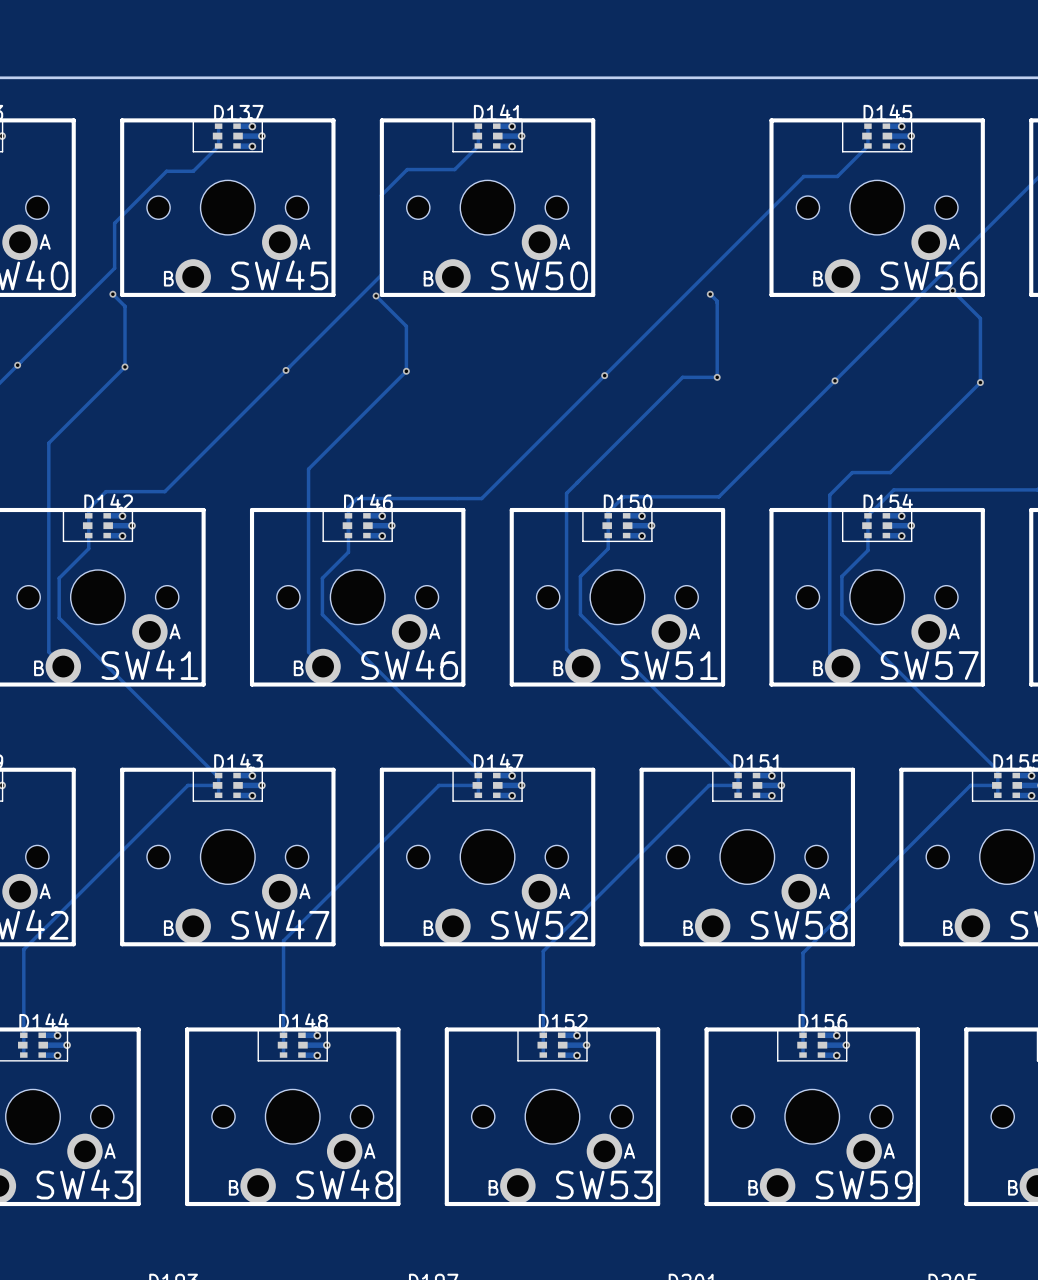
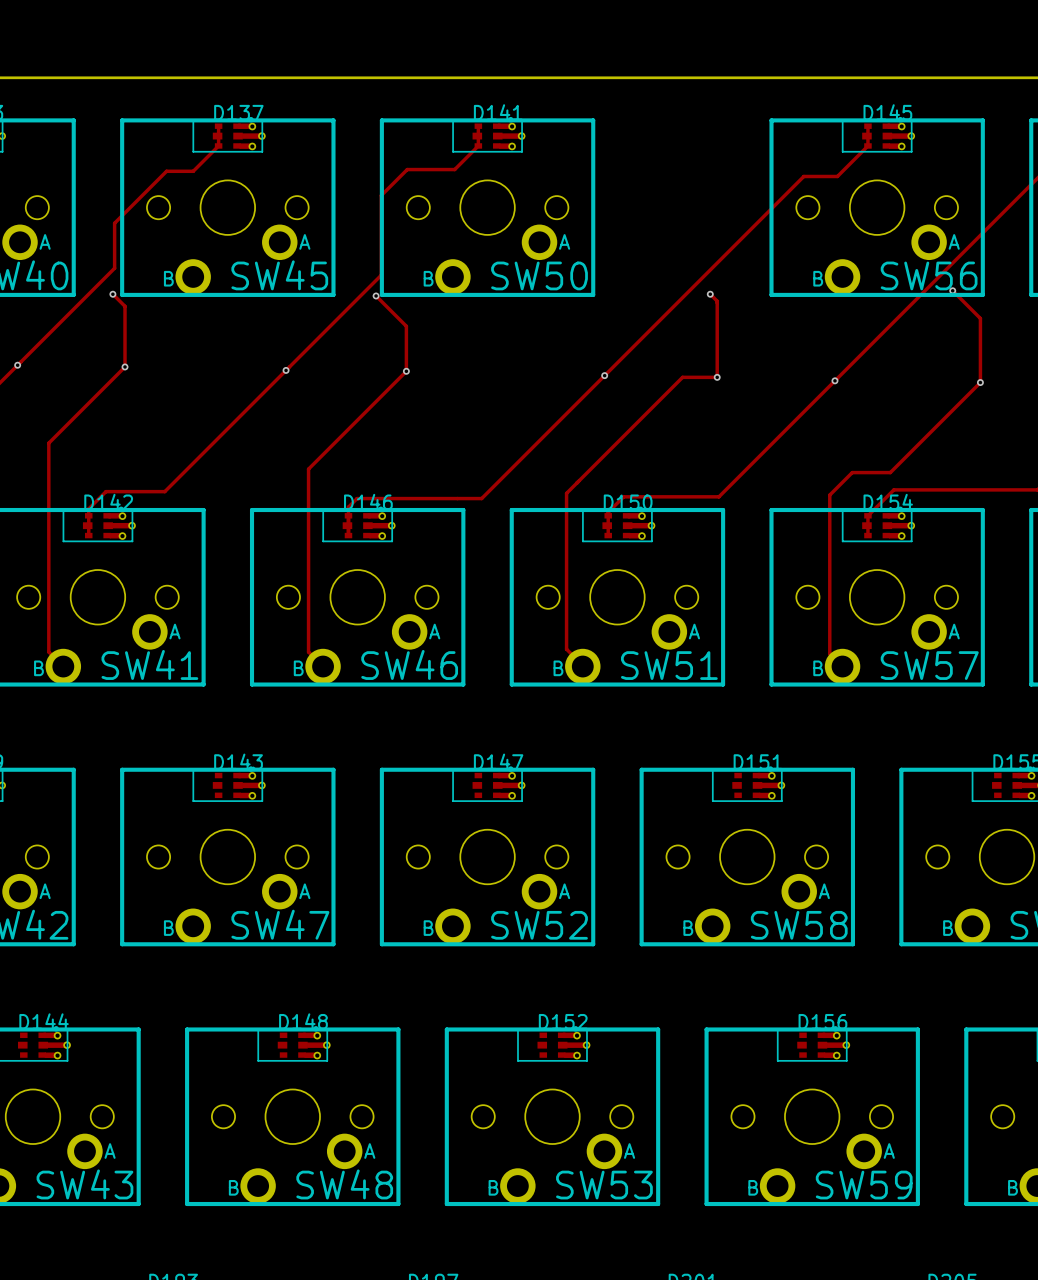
track: (88, 535) (88, 548) (59, 578) (59, 618) (218, 777) (218, 795) -> none
track: (348, 535) (348, 552) (322, 578) (322, 614) (478, 770) (478, 795) -> none
track: (608, 535) (608, 548) (580, 576) (580, 614) (738, 772) (738, 795) -> none
track: (867, 535) (867, 550) (841, 576) (841, 614) (997, 770) (997, 795) -> none
track: (217, 785) (187, 785) (23, 949) (23, 1055) -> none
track: (477, 785) (439, 785) (283, 940) (283, 1055) -> none
track: (737, 785) (709, 785) (543, 951) (543, 1055) -> none
track: (996, 785) (970, 785) (803, 953) (803, 1055) -> none

